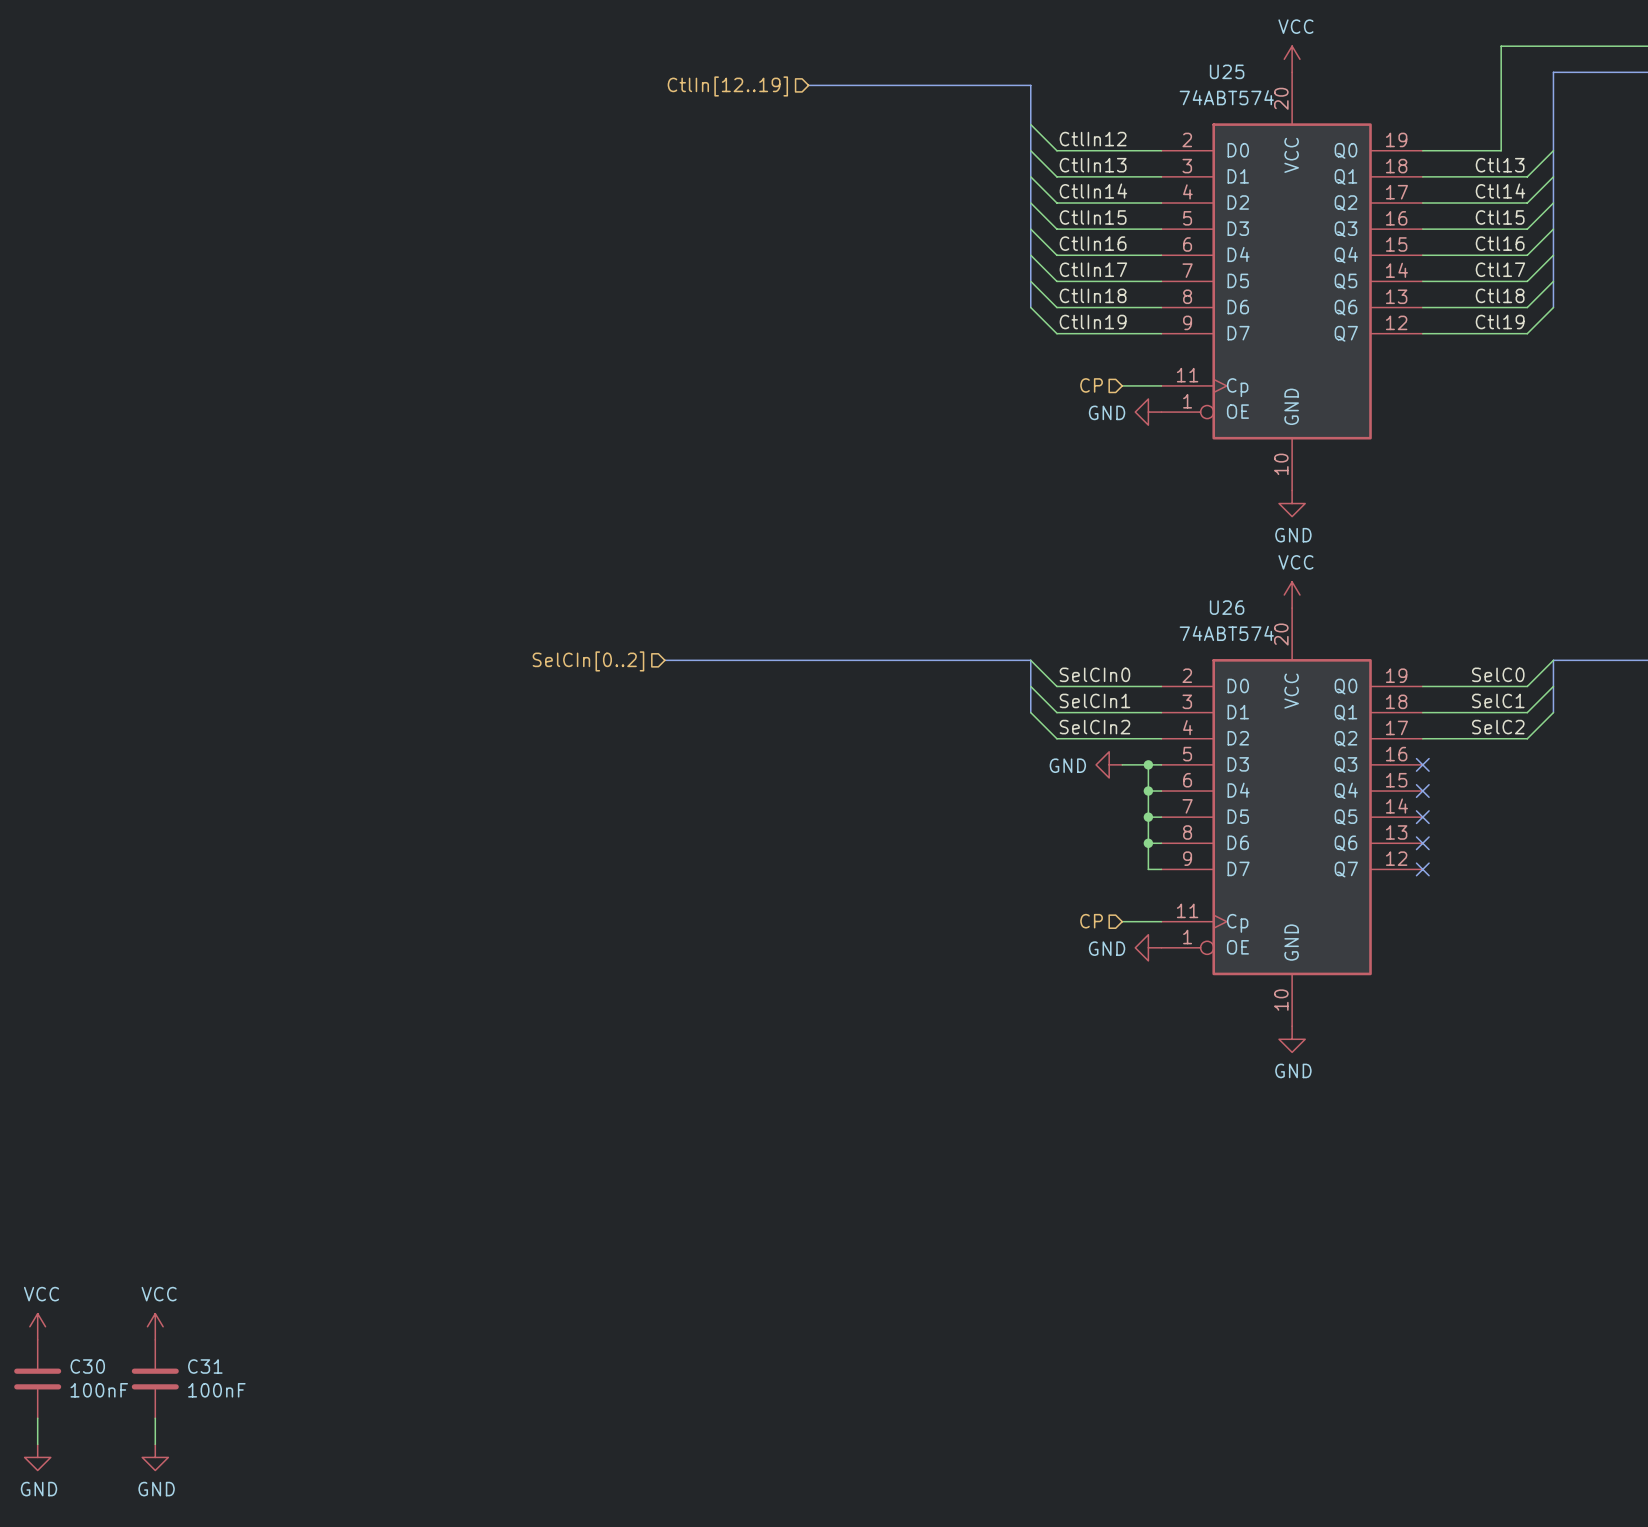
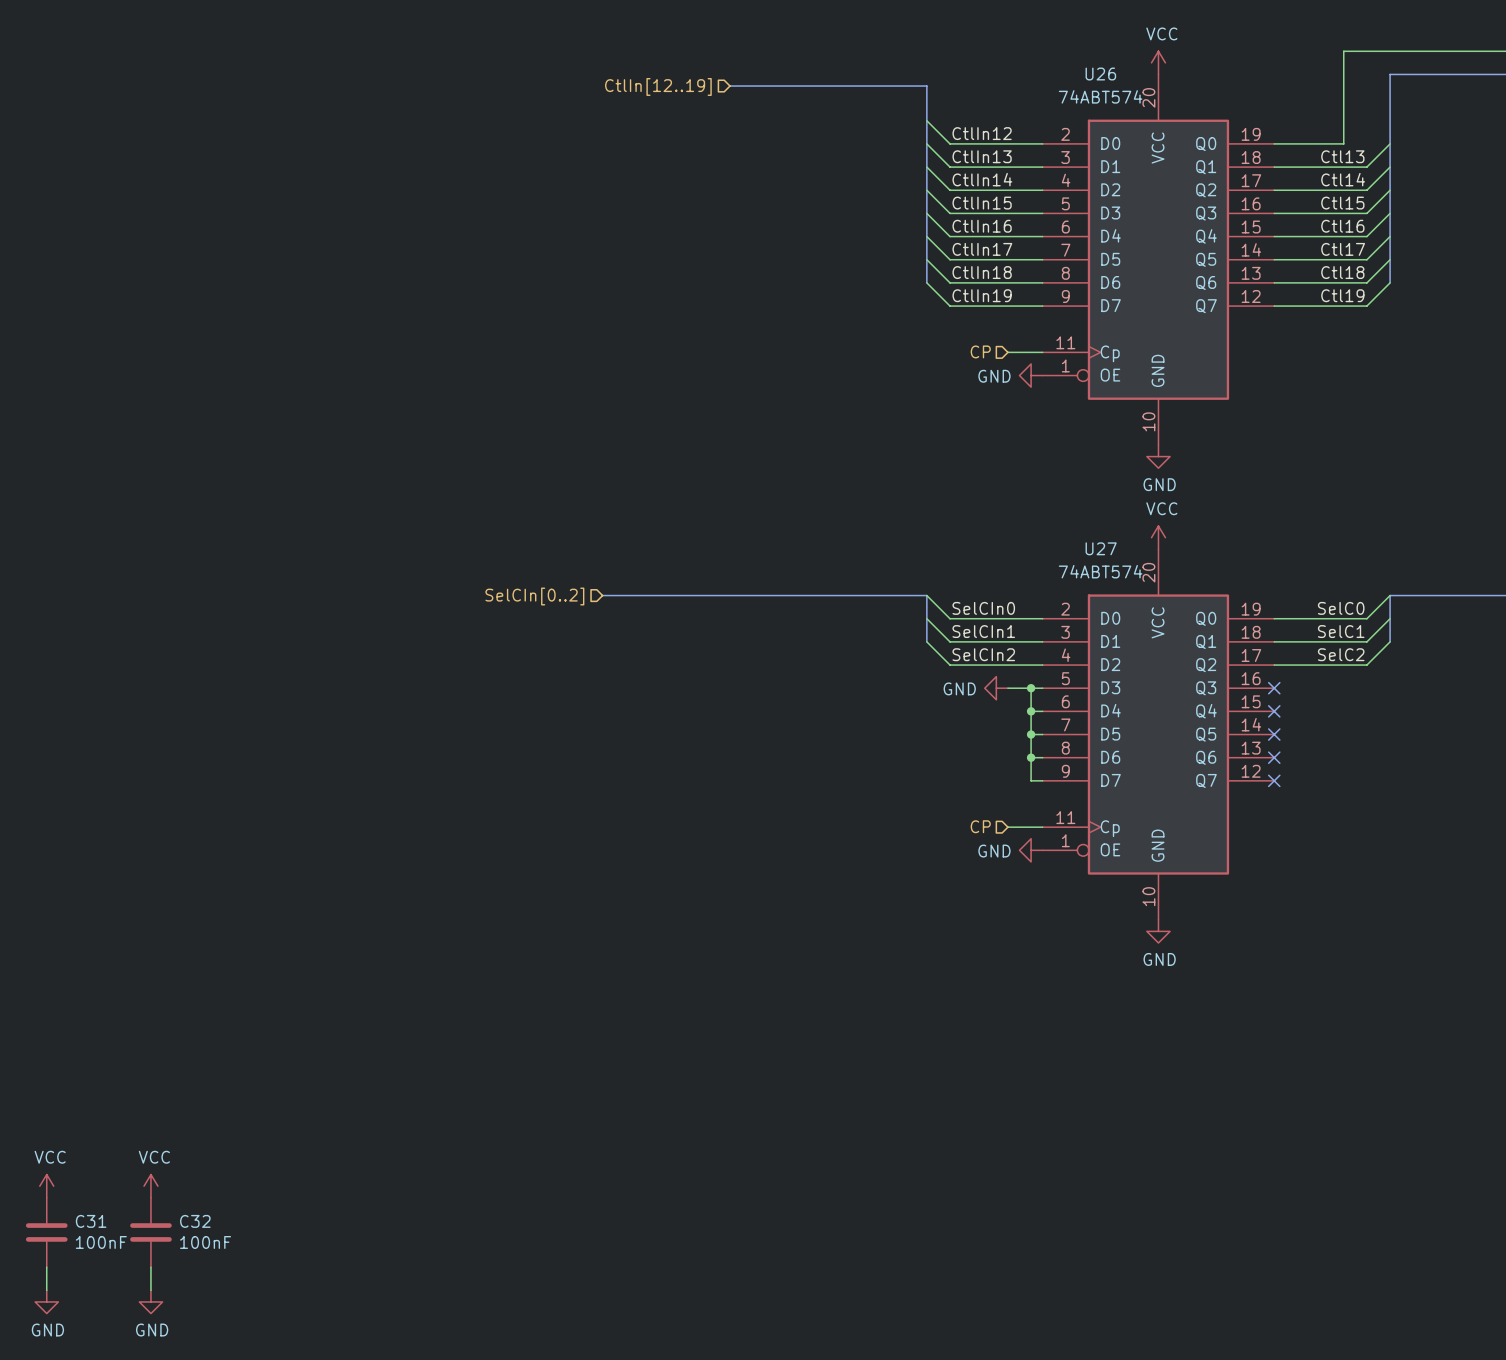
U25 name: U25 (1227, 71) -> U26 (1100, 74)
U26 name: U26 (1227, 607) -> U27 (1101, 548)
C30 name: C30 (87, 1366) -> C31 (91, 1221)
C31 name: C31 (205, 1366) -> C32 (195, 1221)

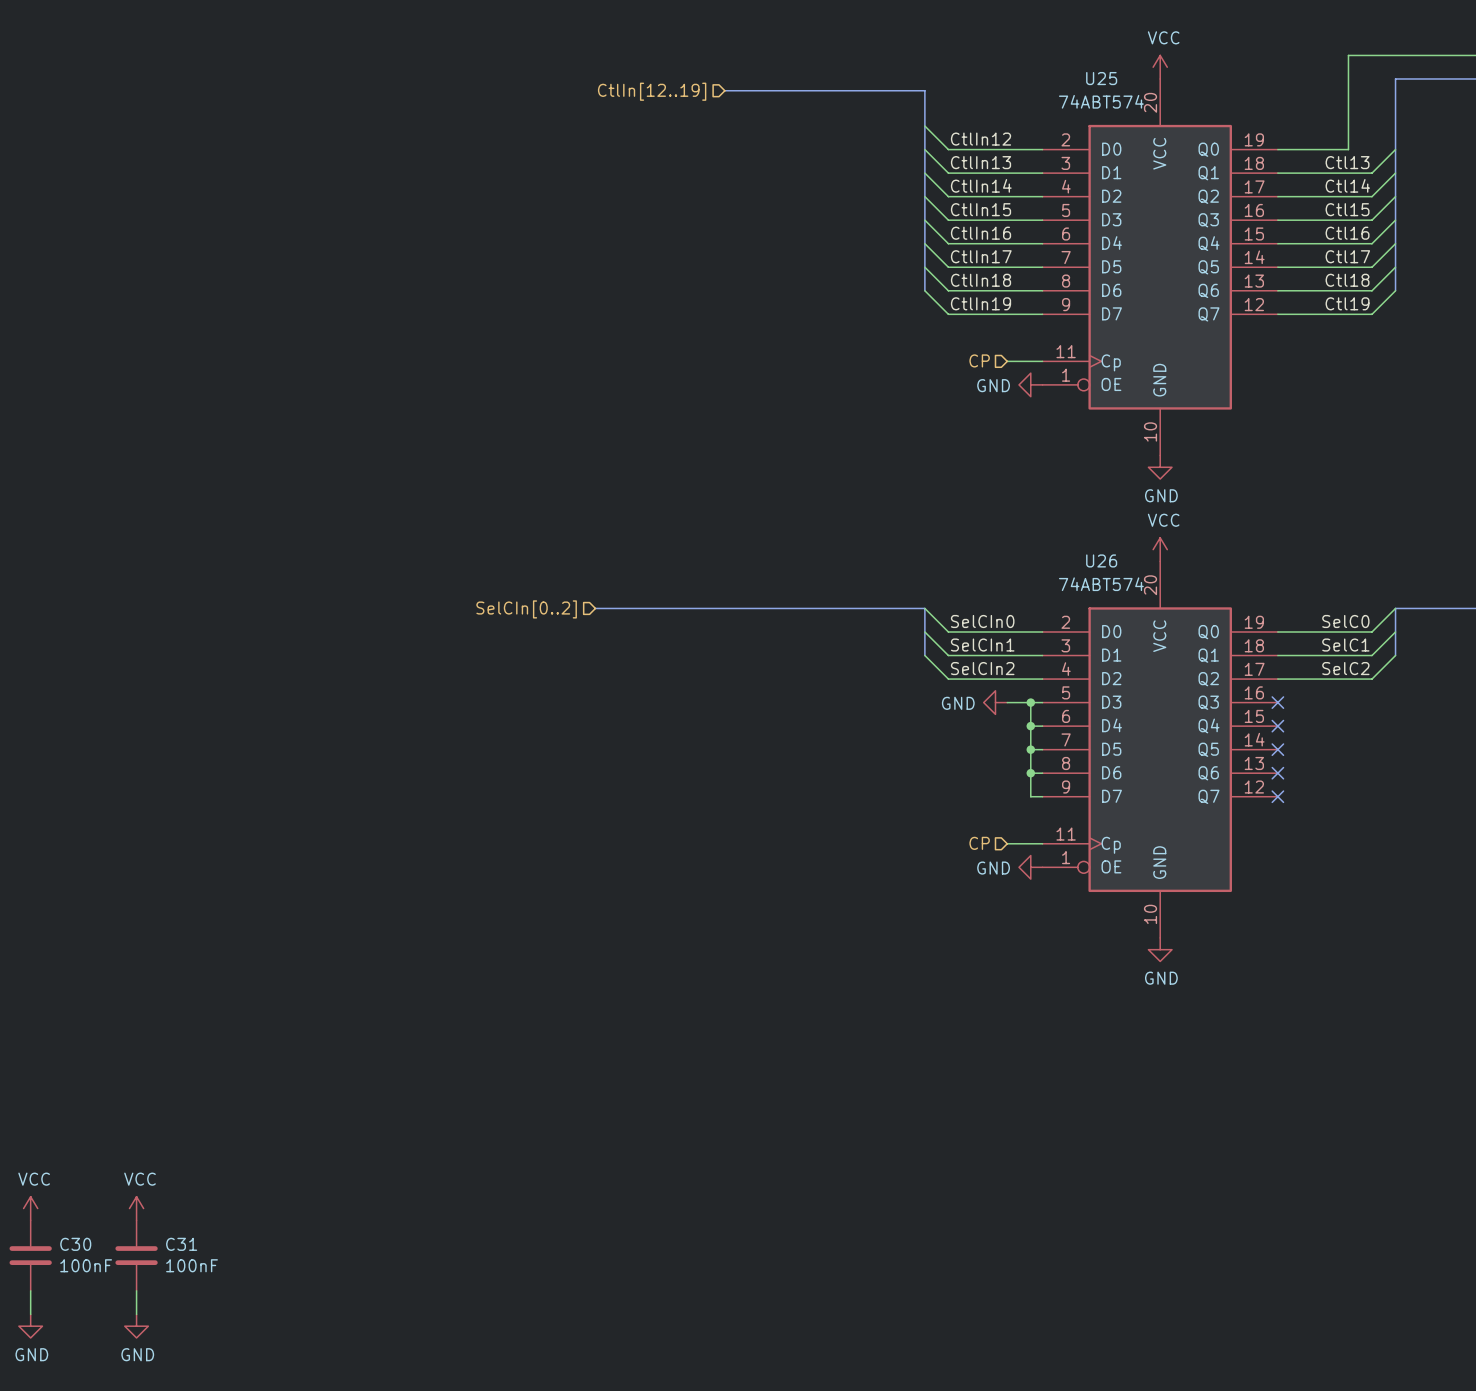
U26 name: U26 (1100, 74) -> U25 (1101, 78)
U27 name: U27 (1101, 548) -> U26 (1101, 560)
C31 name: C31 (91, 1221) -> C30 (75, 1244)
C32 name: C32 (195, 1221) -> C31 (181, 1244)

